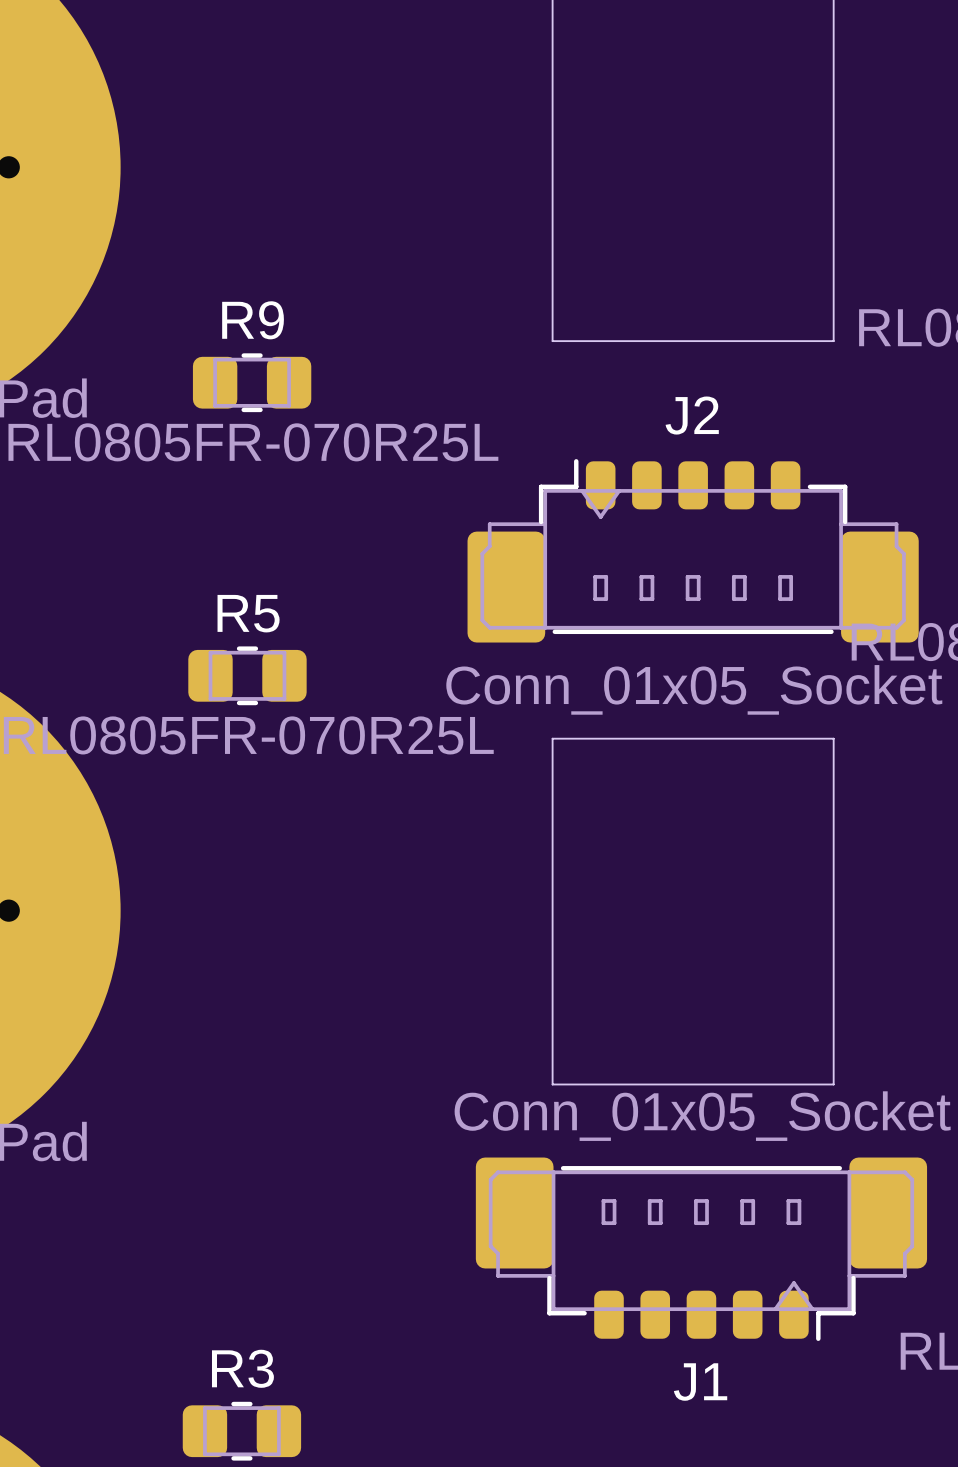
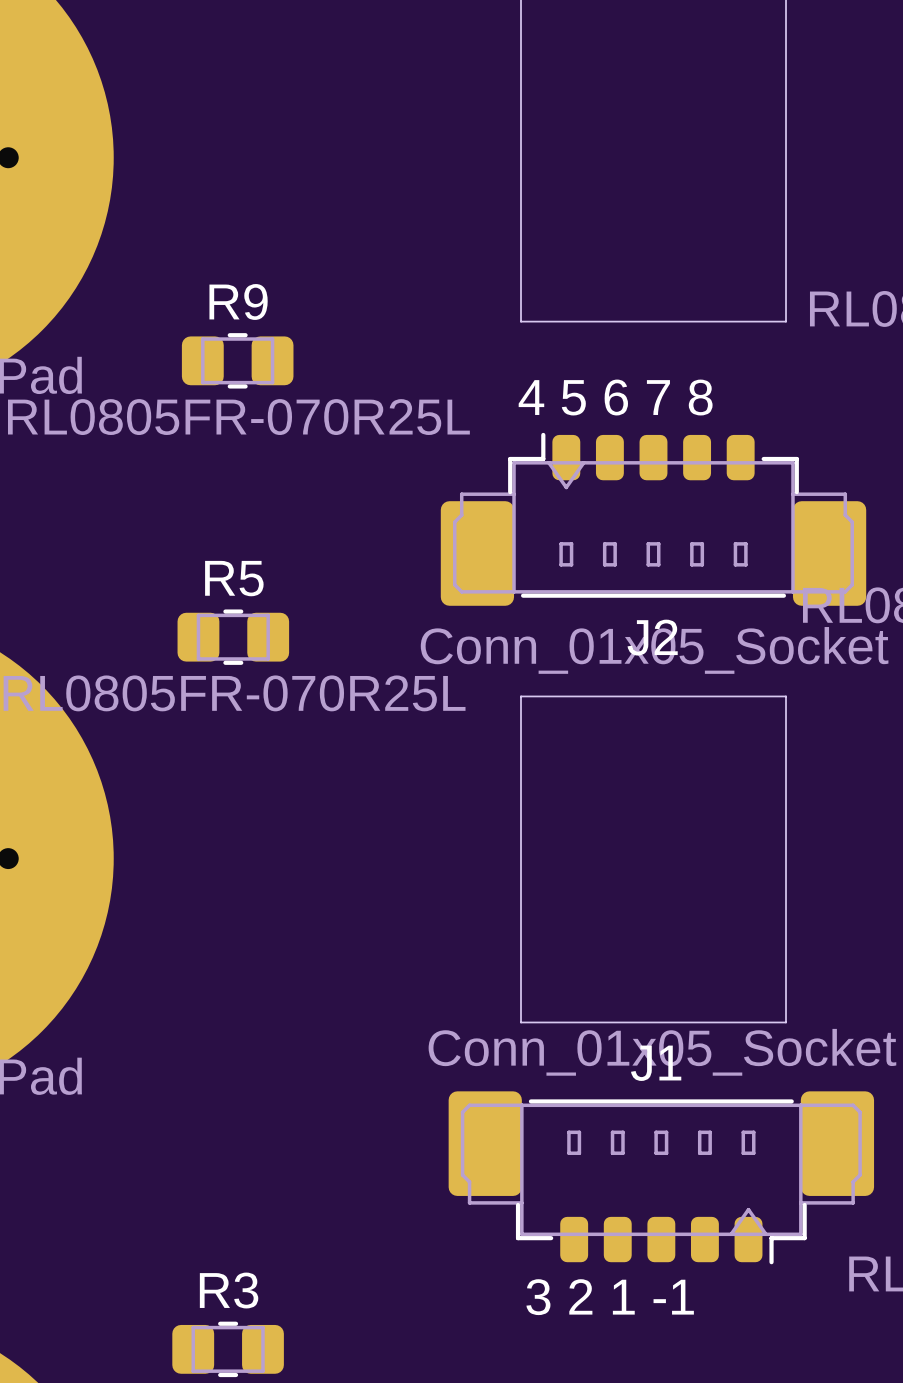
J2 name position: J2 (692, 415) -> J2 (652, 637)
text: none -> 4 5 6 7 8 (615, 397)
text: none -> 3 2 1 -1 (610, 1297)
J1 name position: J1 (700, 1382) -> J1 (656, 1063)

